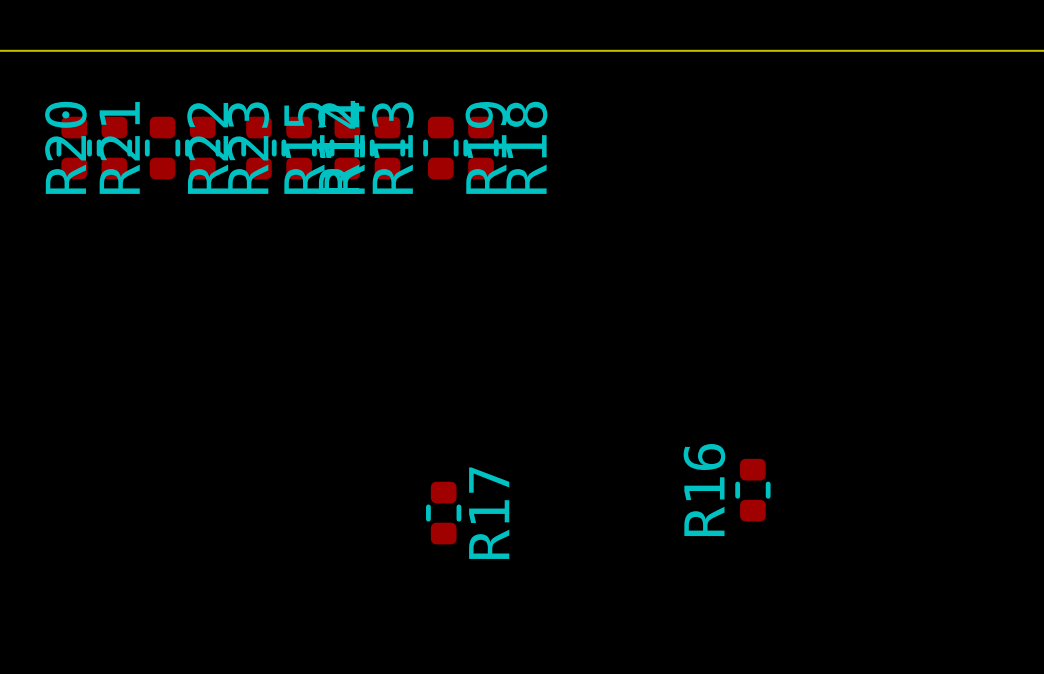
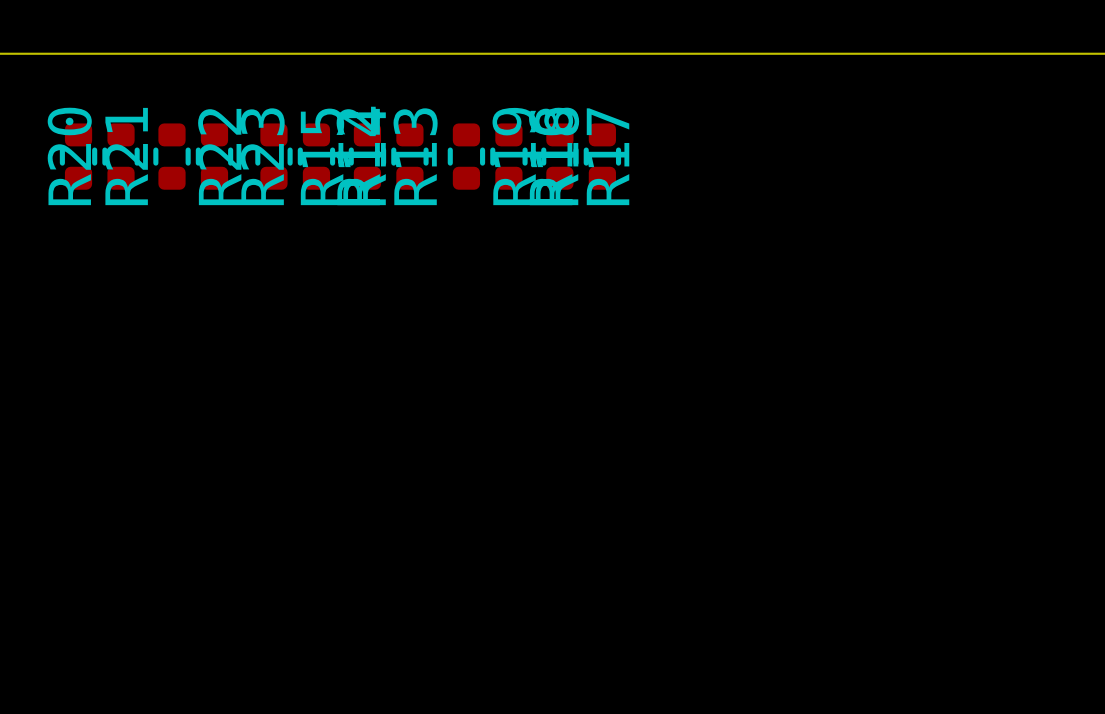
R16 position: (752, 490) -> (602, 156)
R17 position: (443, 513) -> (559, 156)

